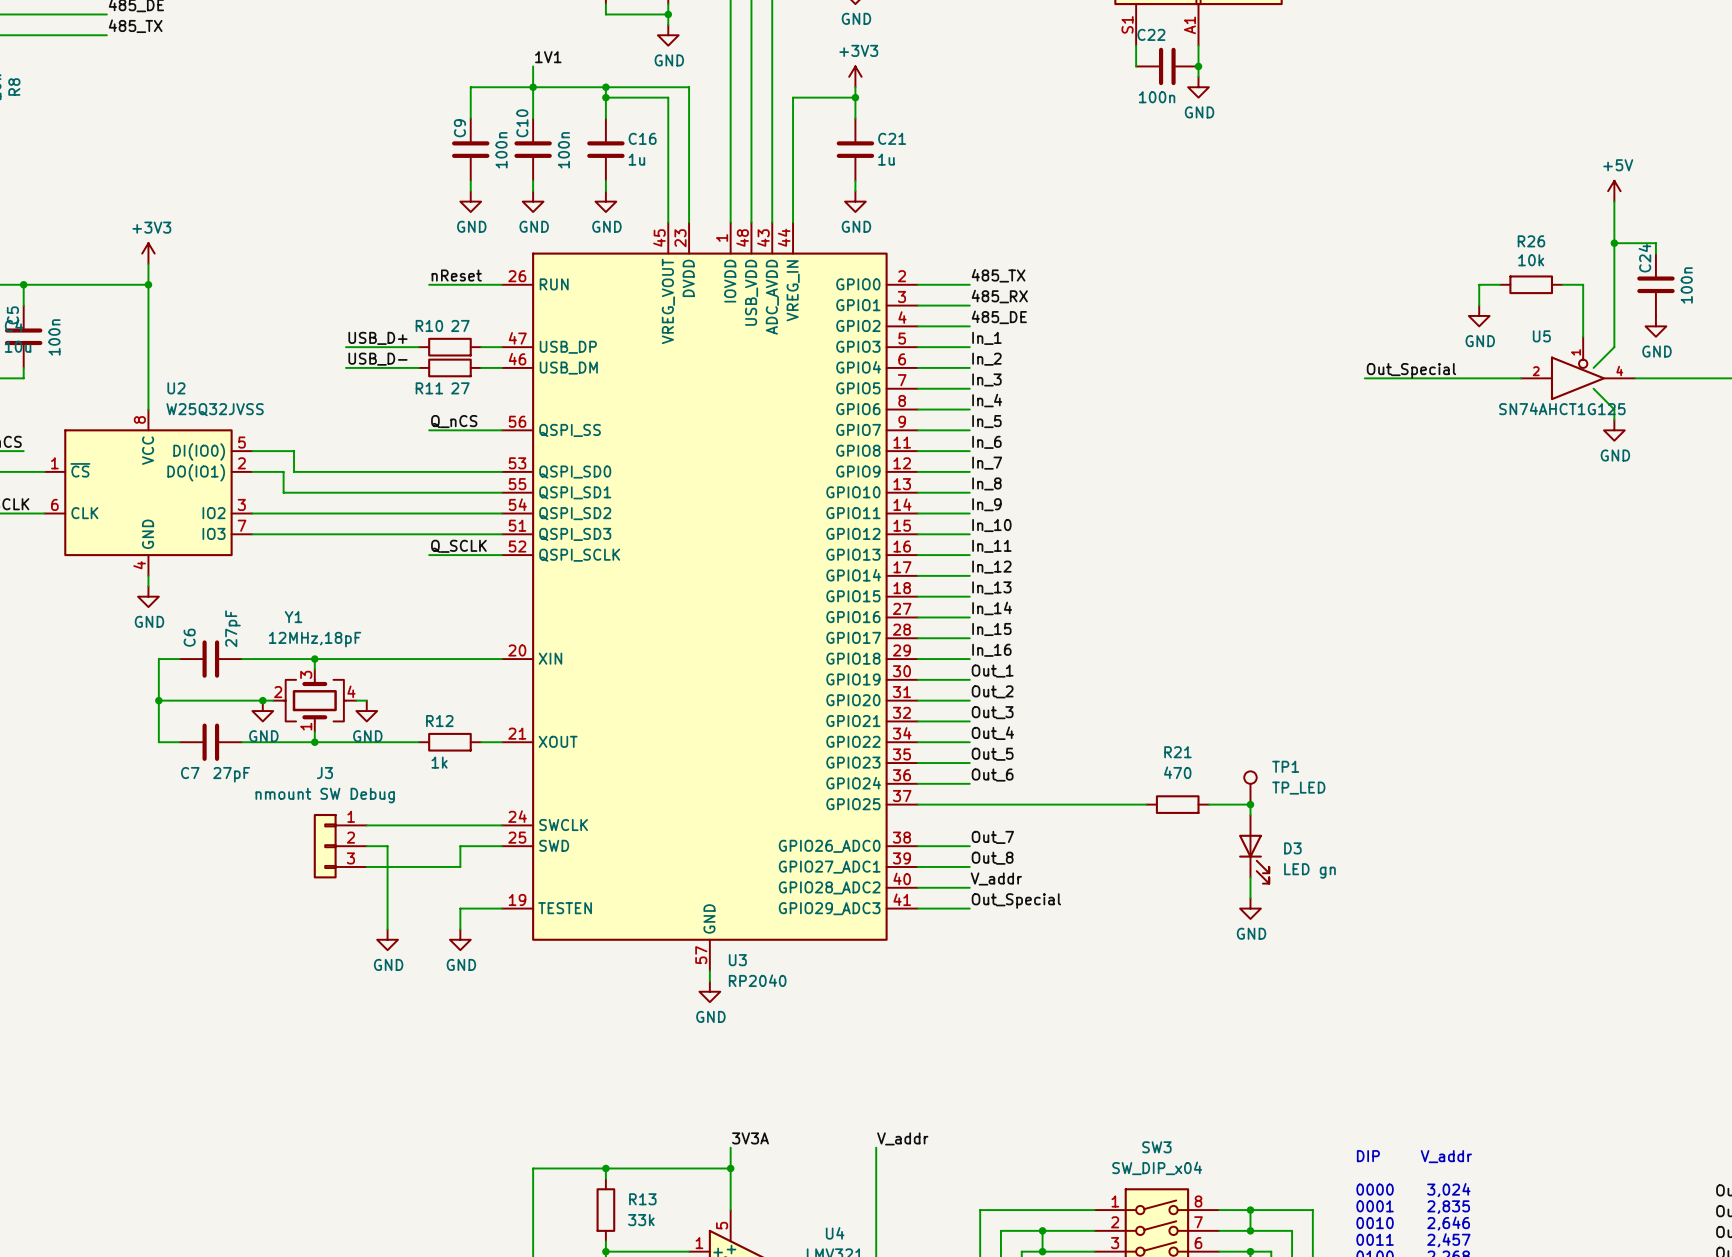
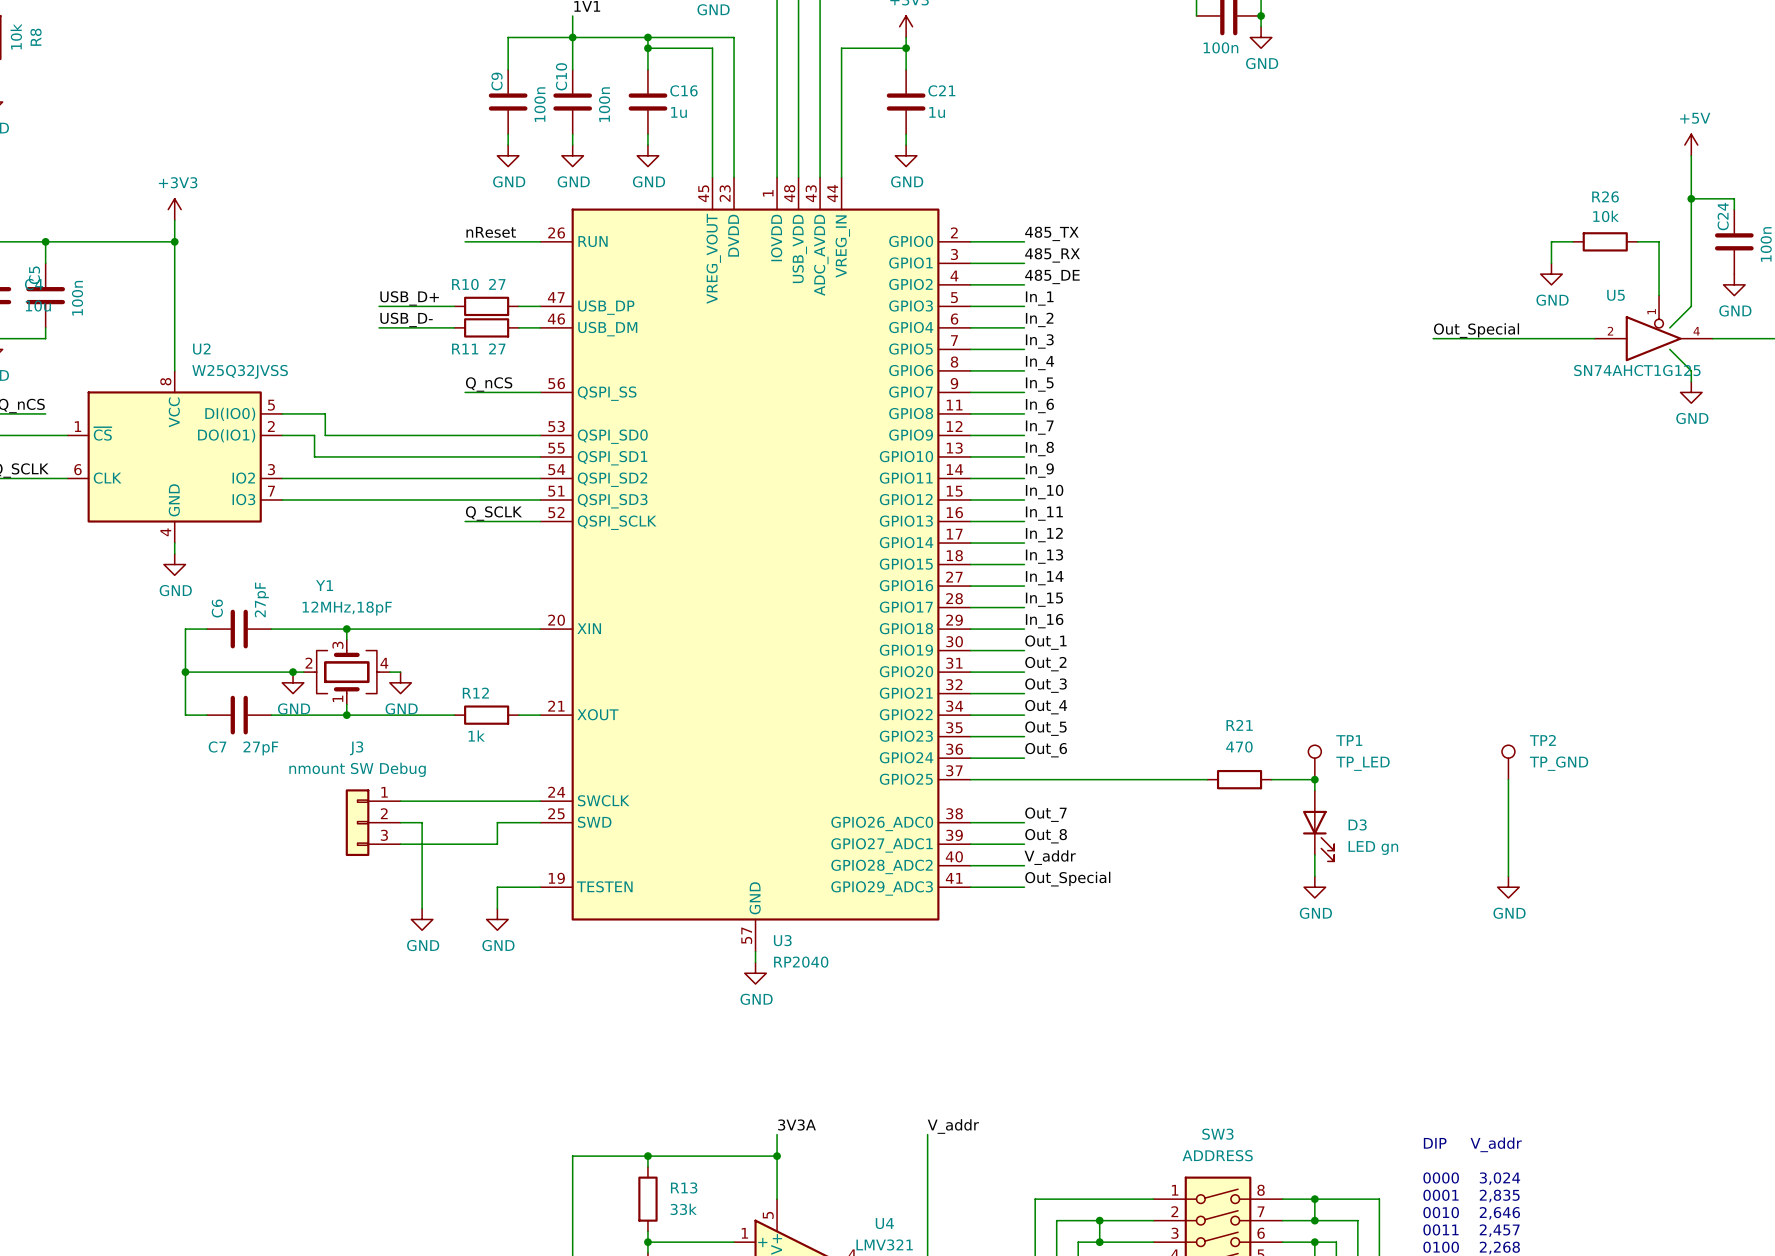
TP2: none -> TP_GND (1508, 762)
wire: none -> (1508, 779) (1508, 876)
power symbol: none -> GND (1508, 887)
SW3 value: SW_DIP_x04 (1157, 1168) -> ADDRESS (1217, 1155)

